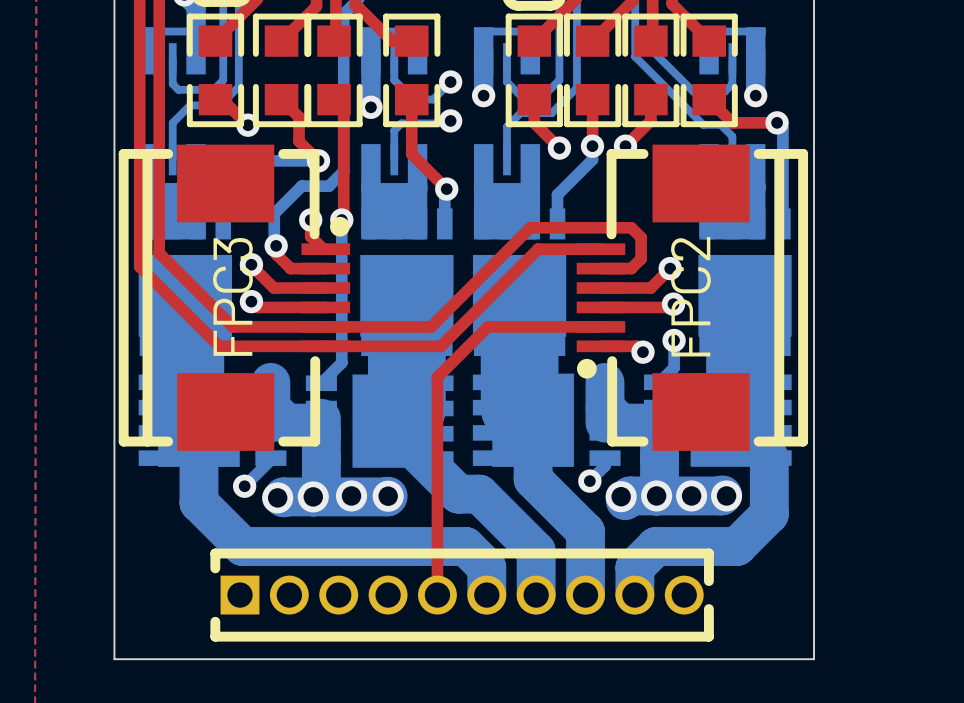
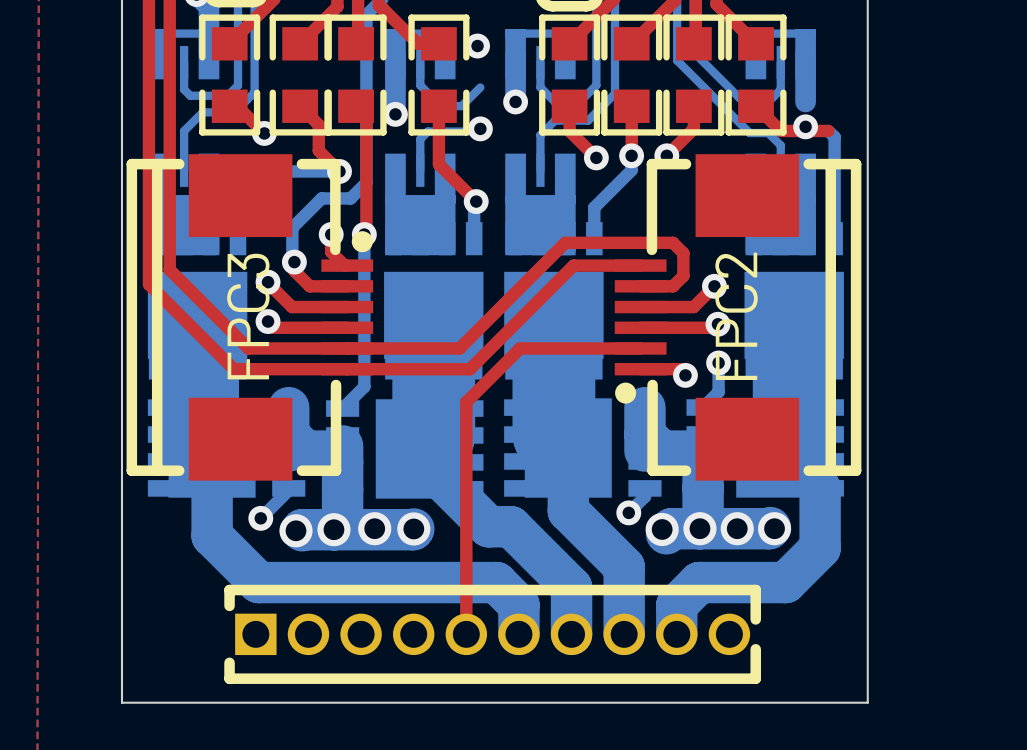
via position: (450, 82) -> (477, 46)
via: (755, 95) -> none
via position: (777, 122) -> (805, 126)

